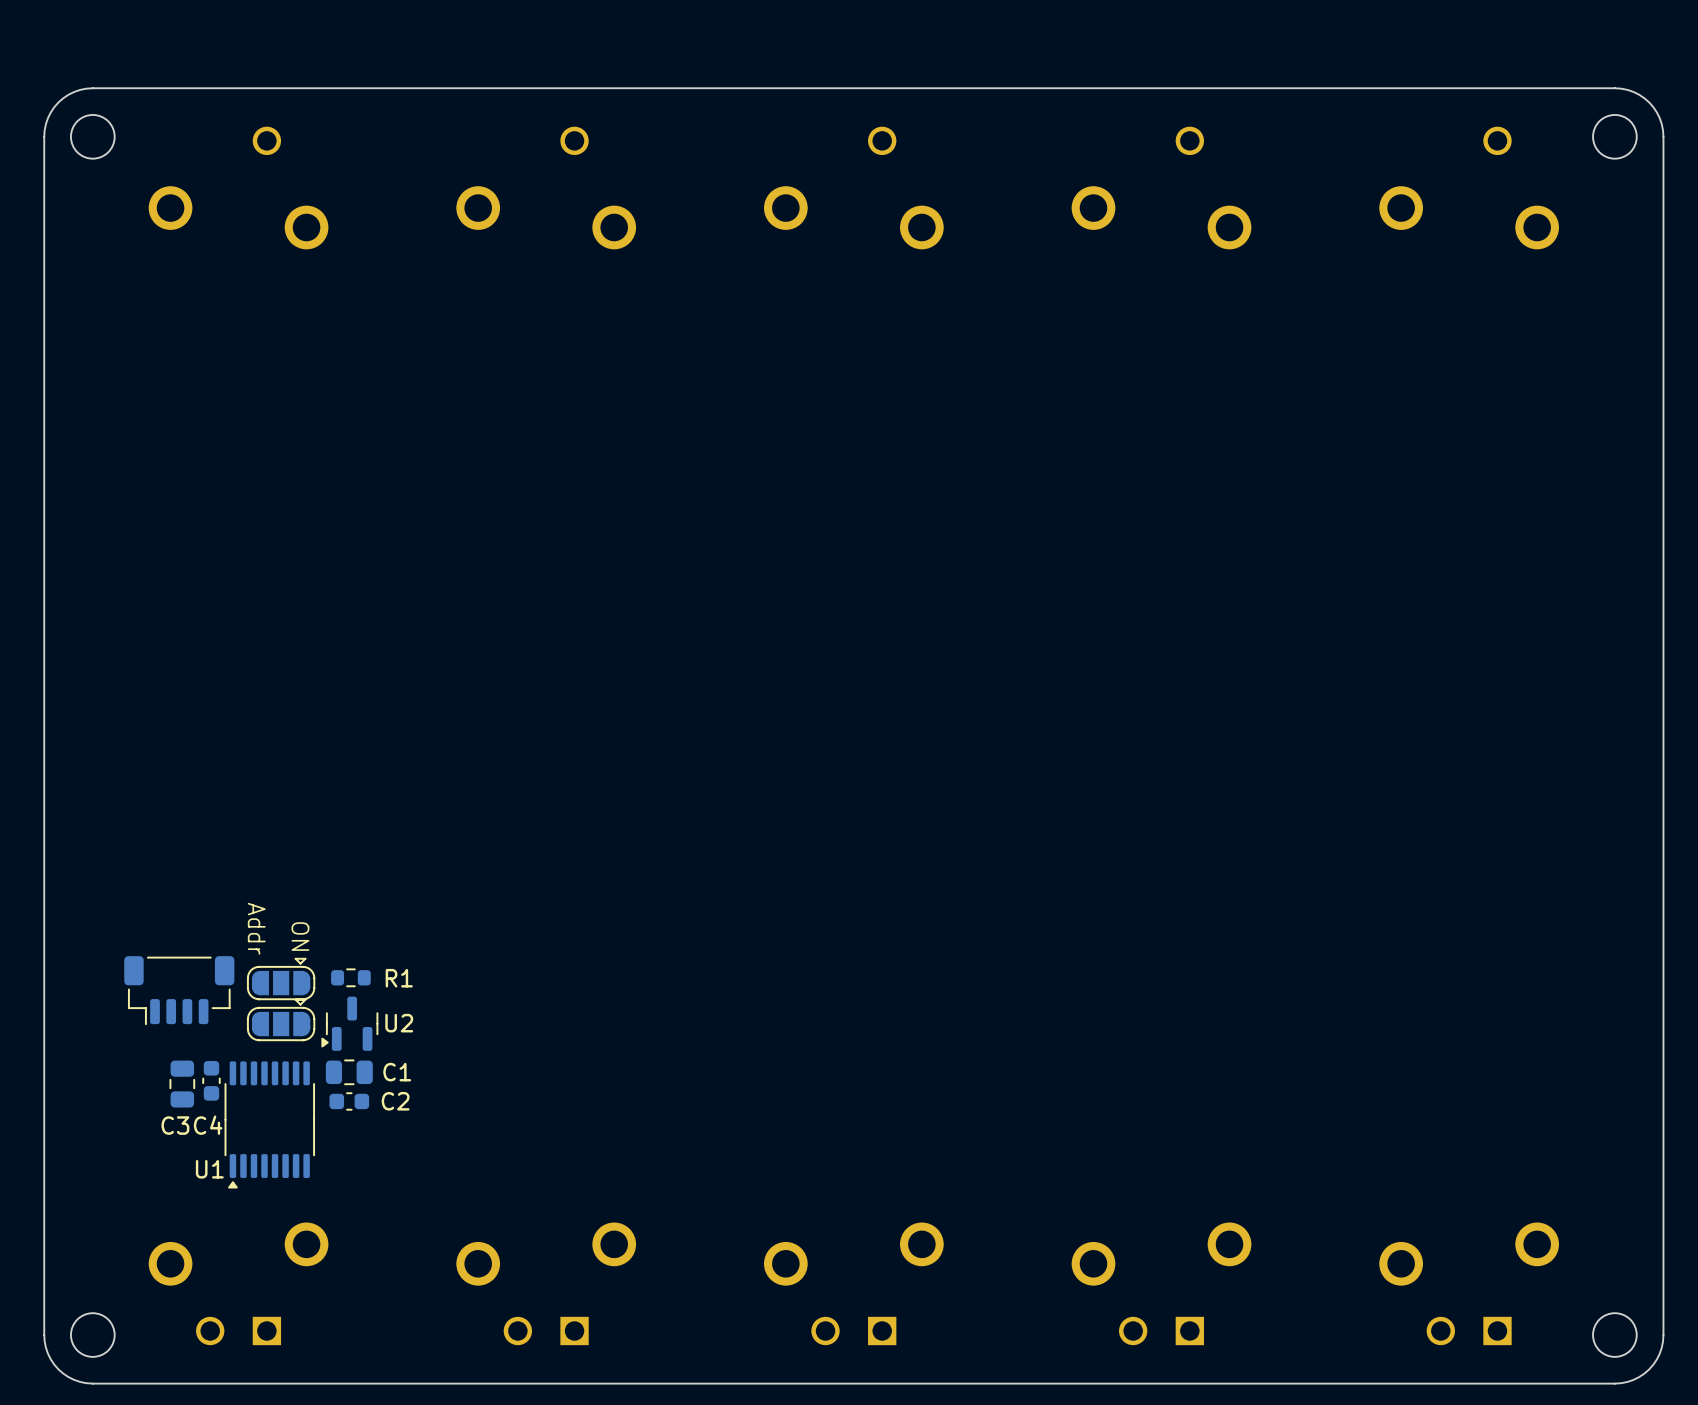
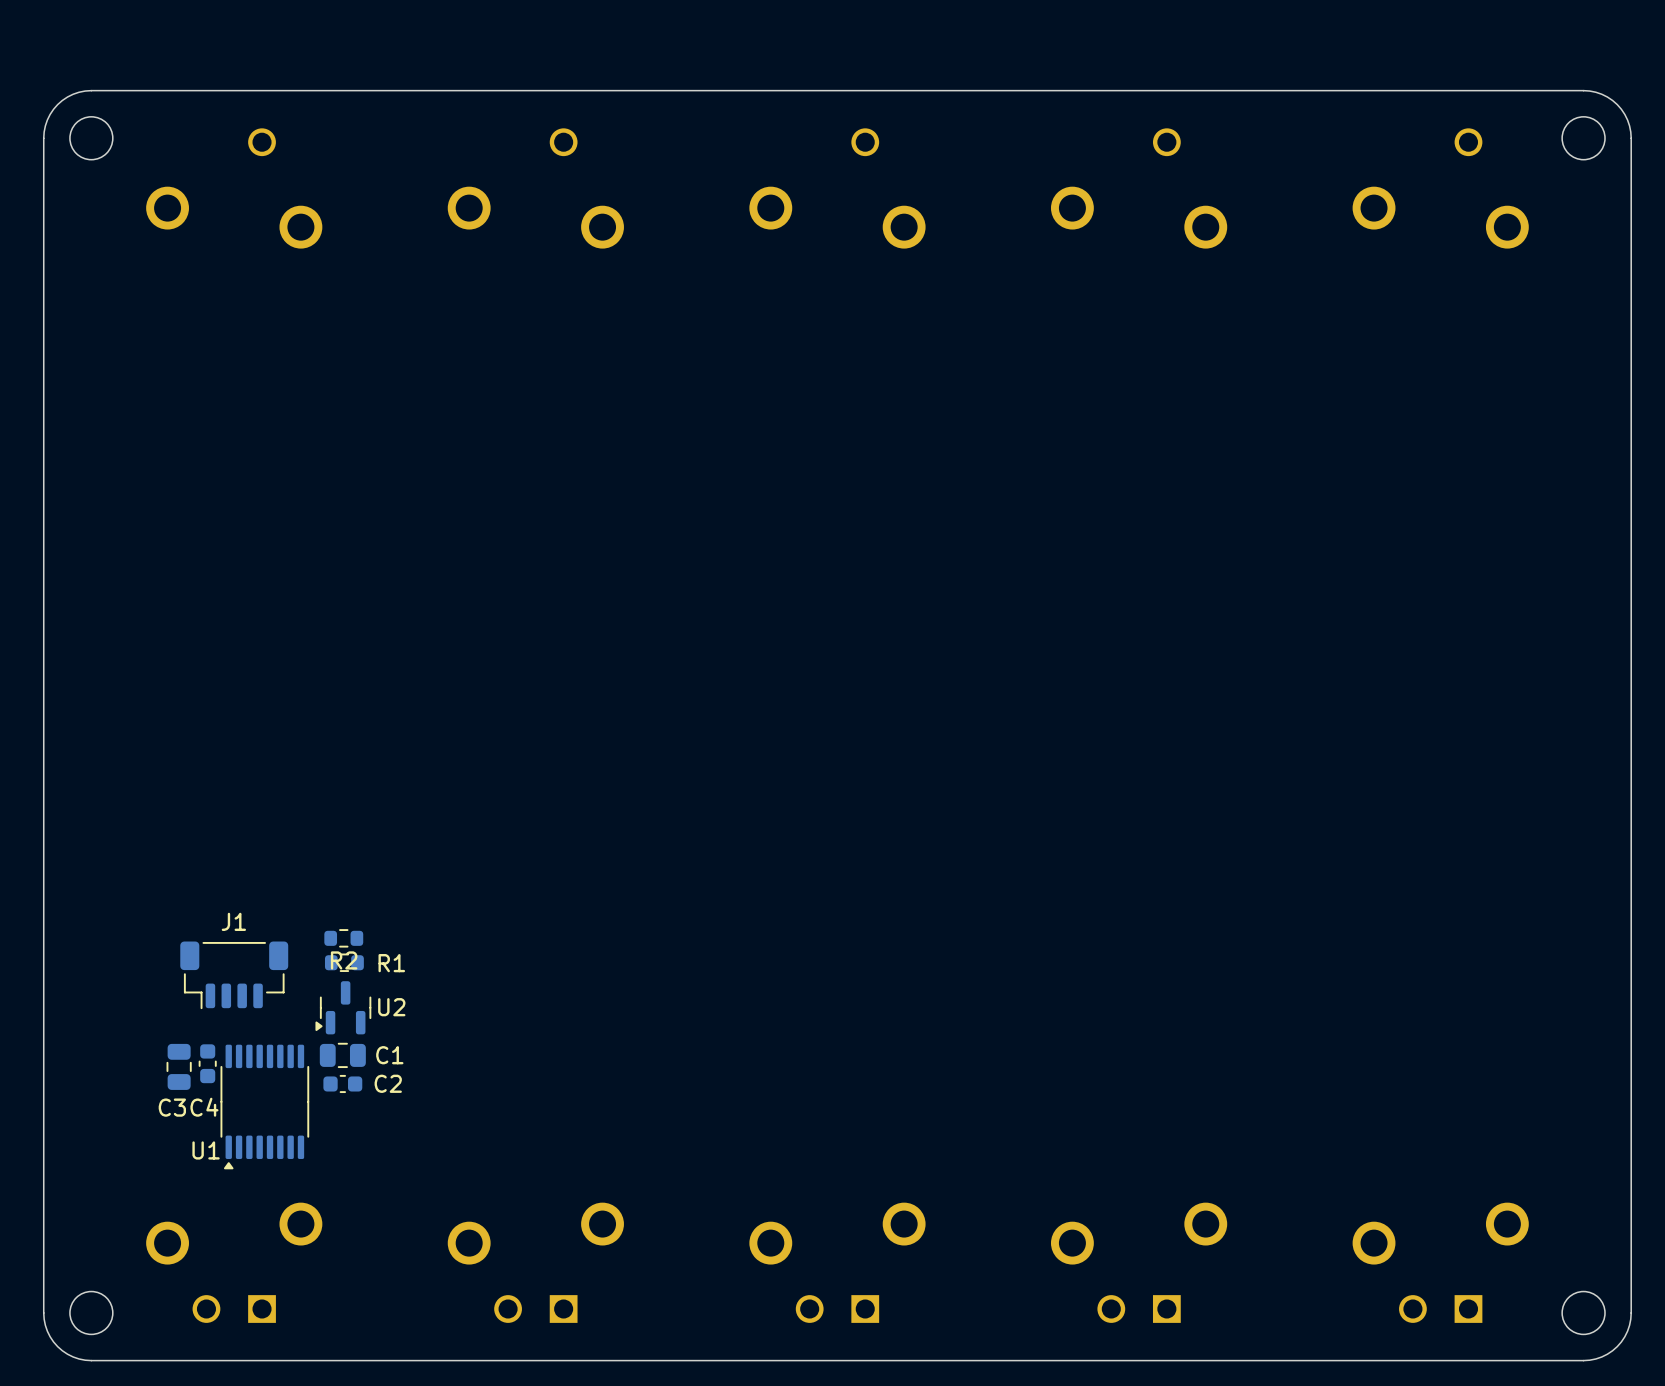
text: Addr (256, 928) -> none
text: ON (300, 936) -> none
R2: none -> (343, 938)
part: (281, 979) -> none
part: (179, 990) -> none
J1: none -> (234, 975)
part: (281, 1019) -> none

